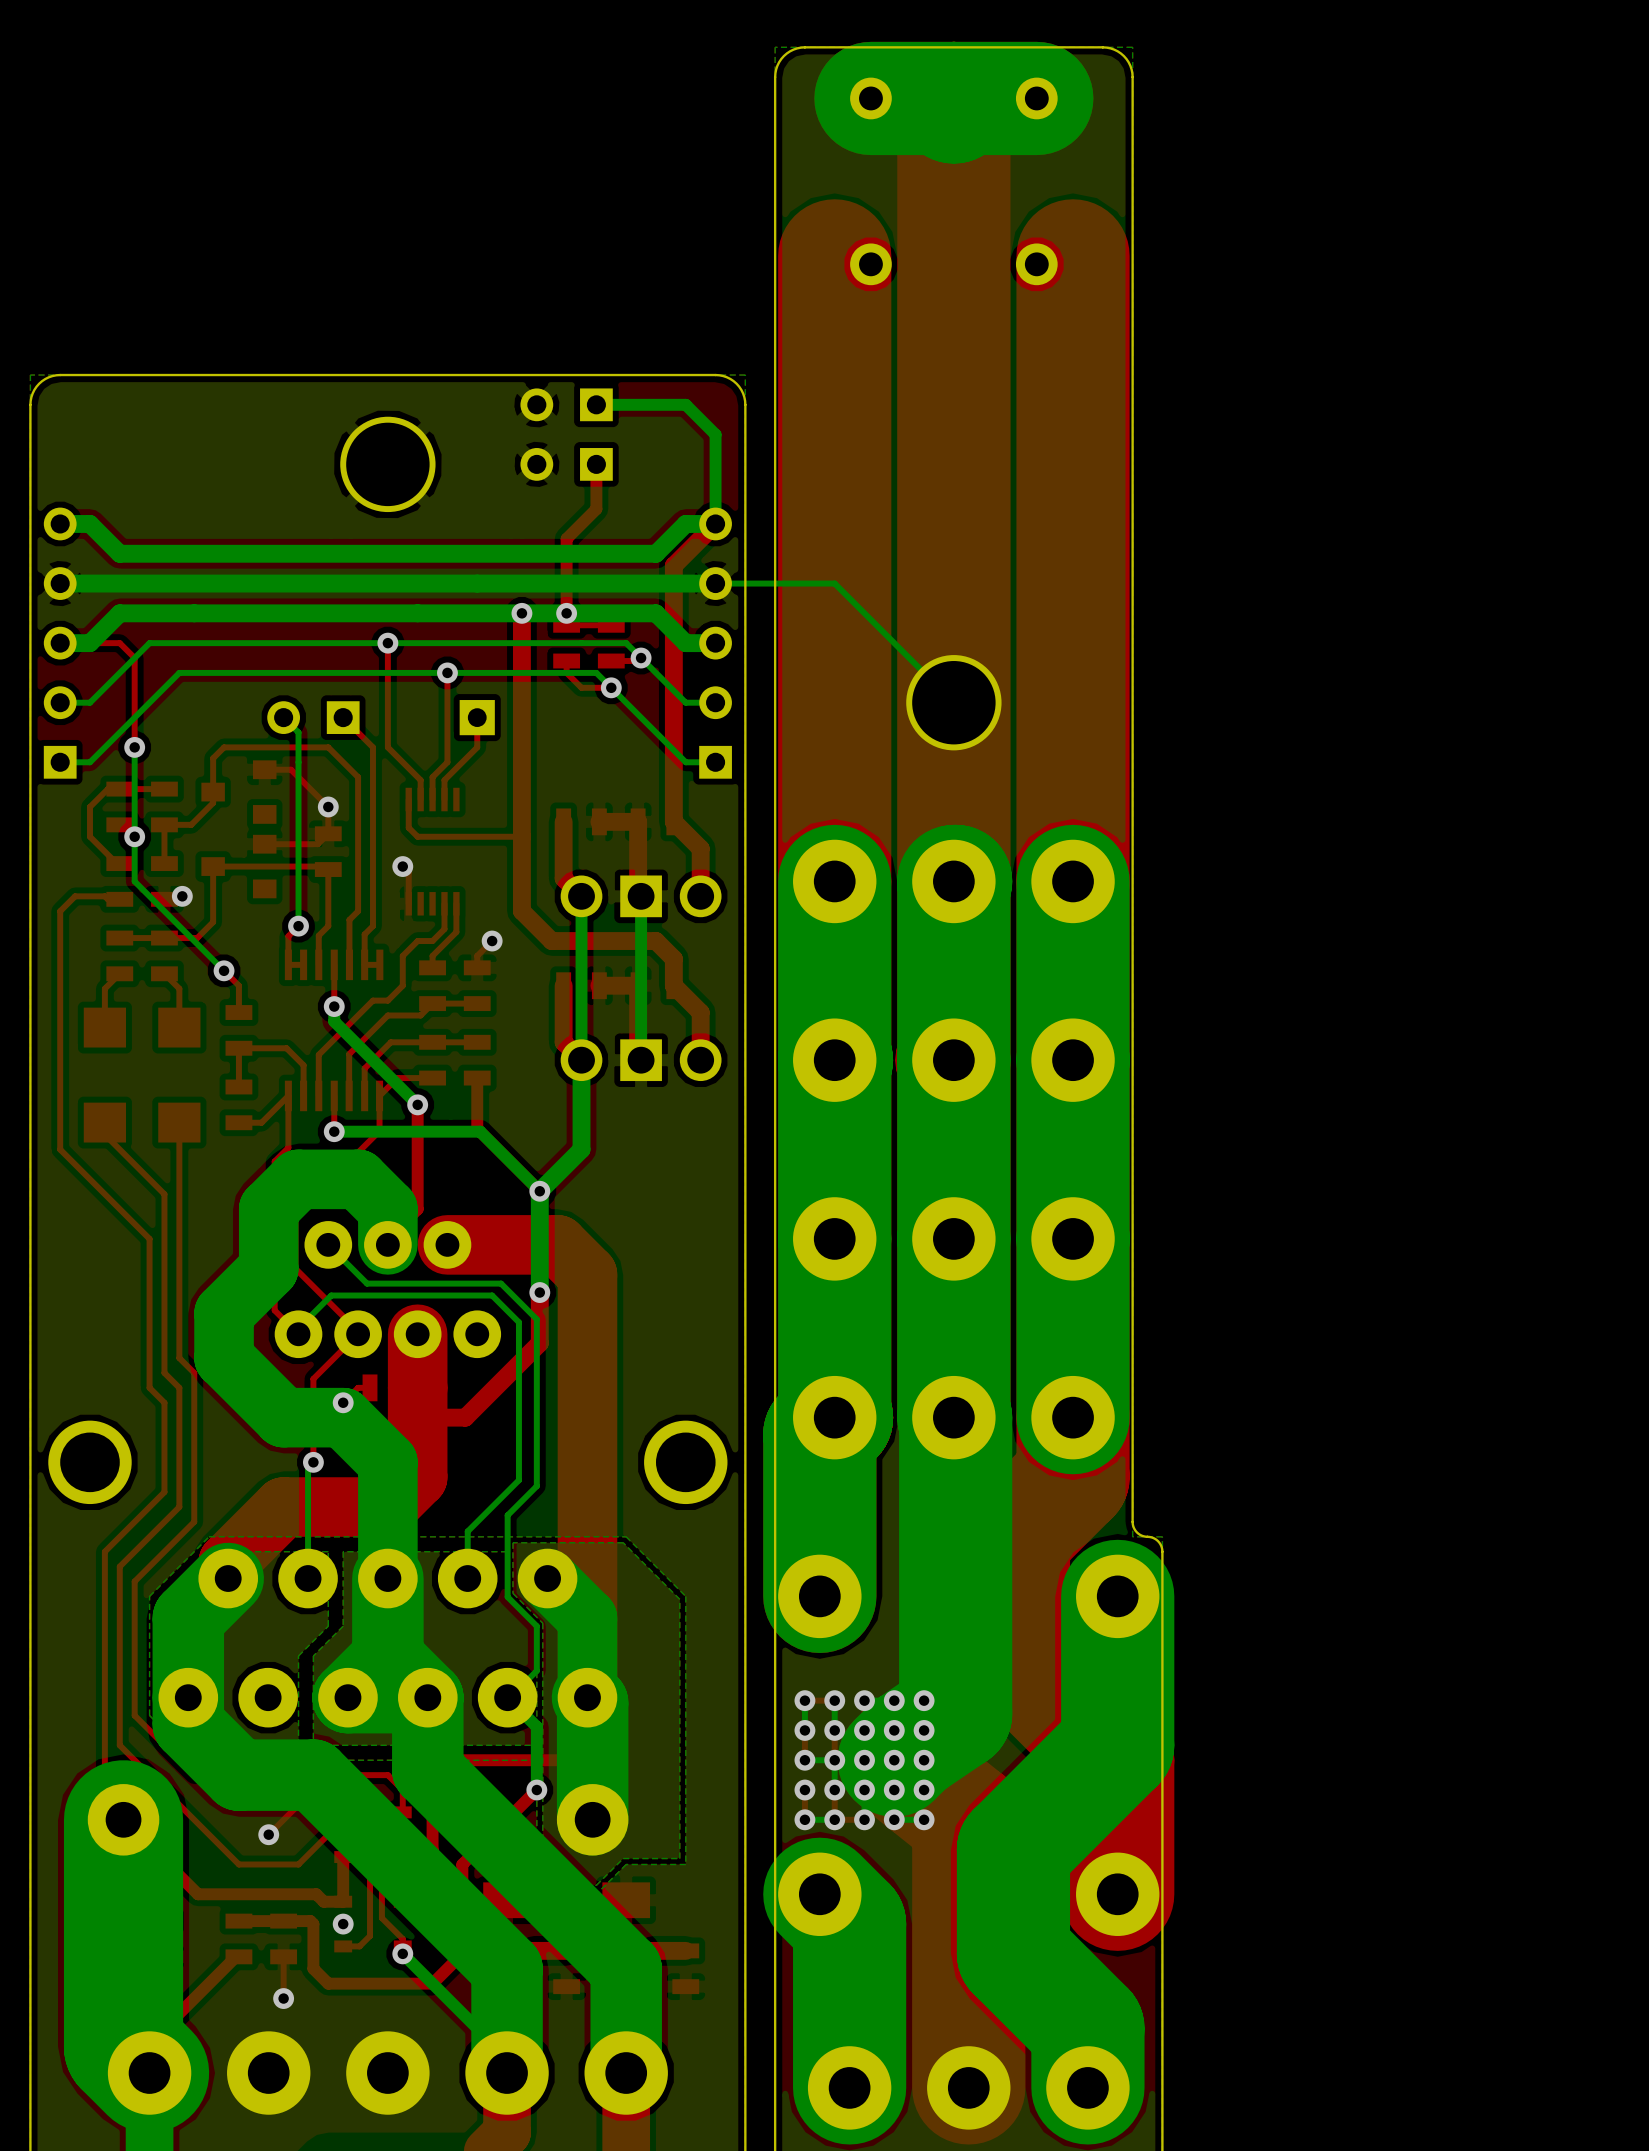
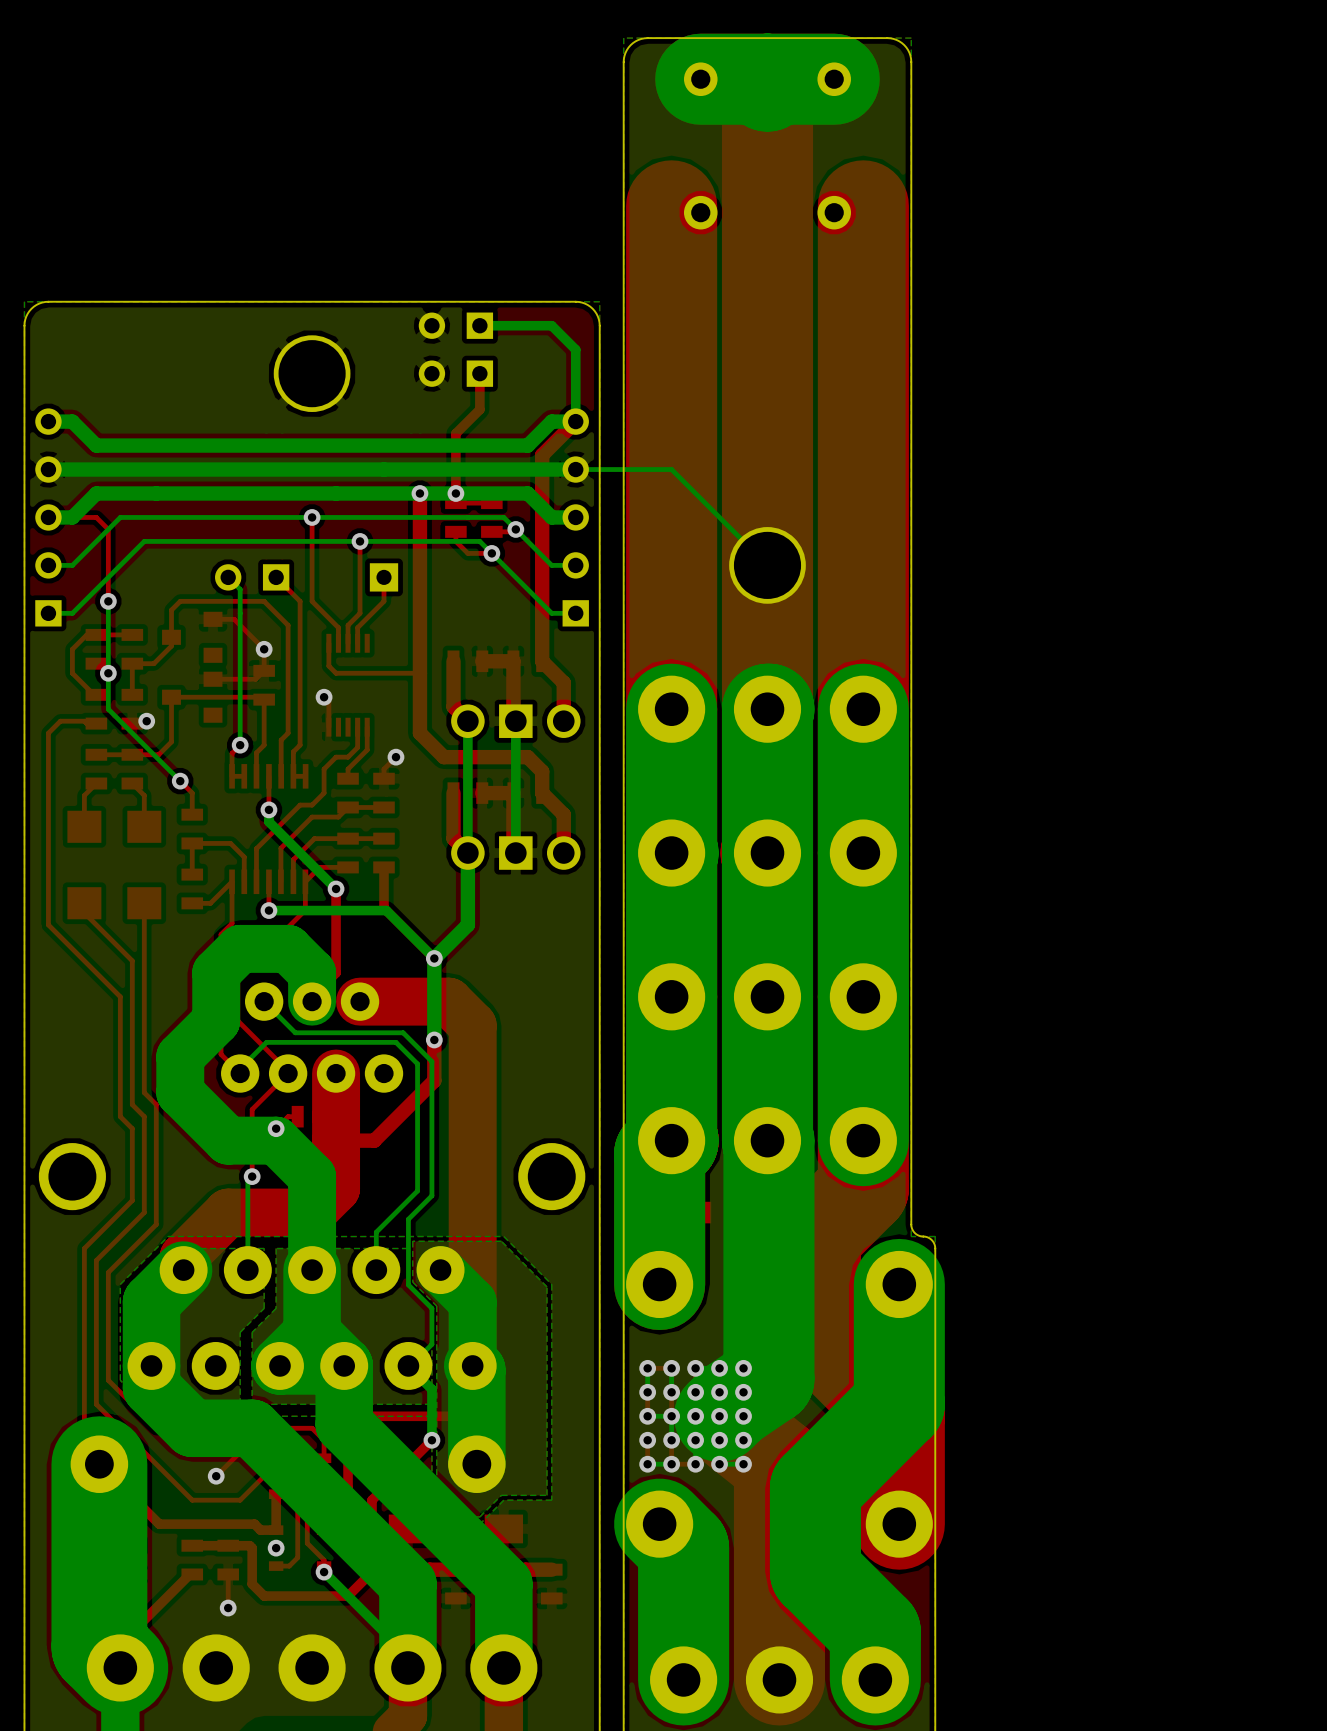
part: none -> (719, 1212)

